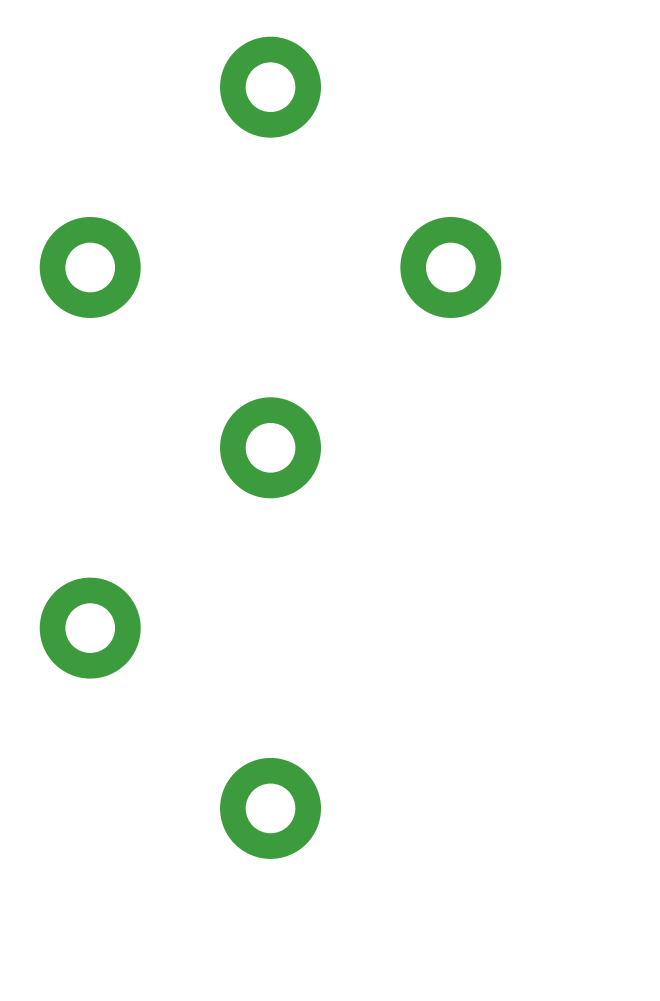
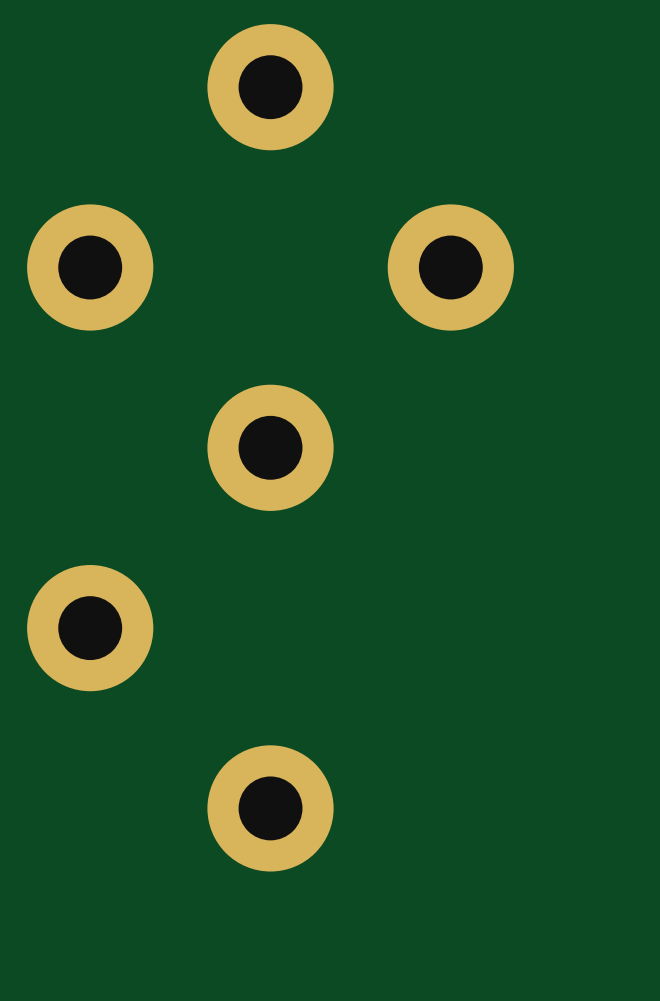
part footprint: [39, 36, 502, 318] -> [27, 24, 514, 331]
part footprint: [39, 397, 322, 859] -> [27, 384, 334, 872]

